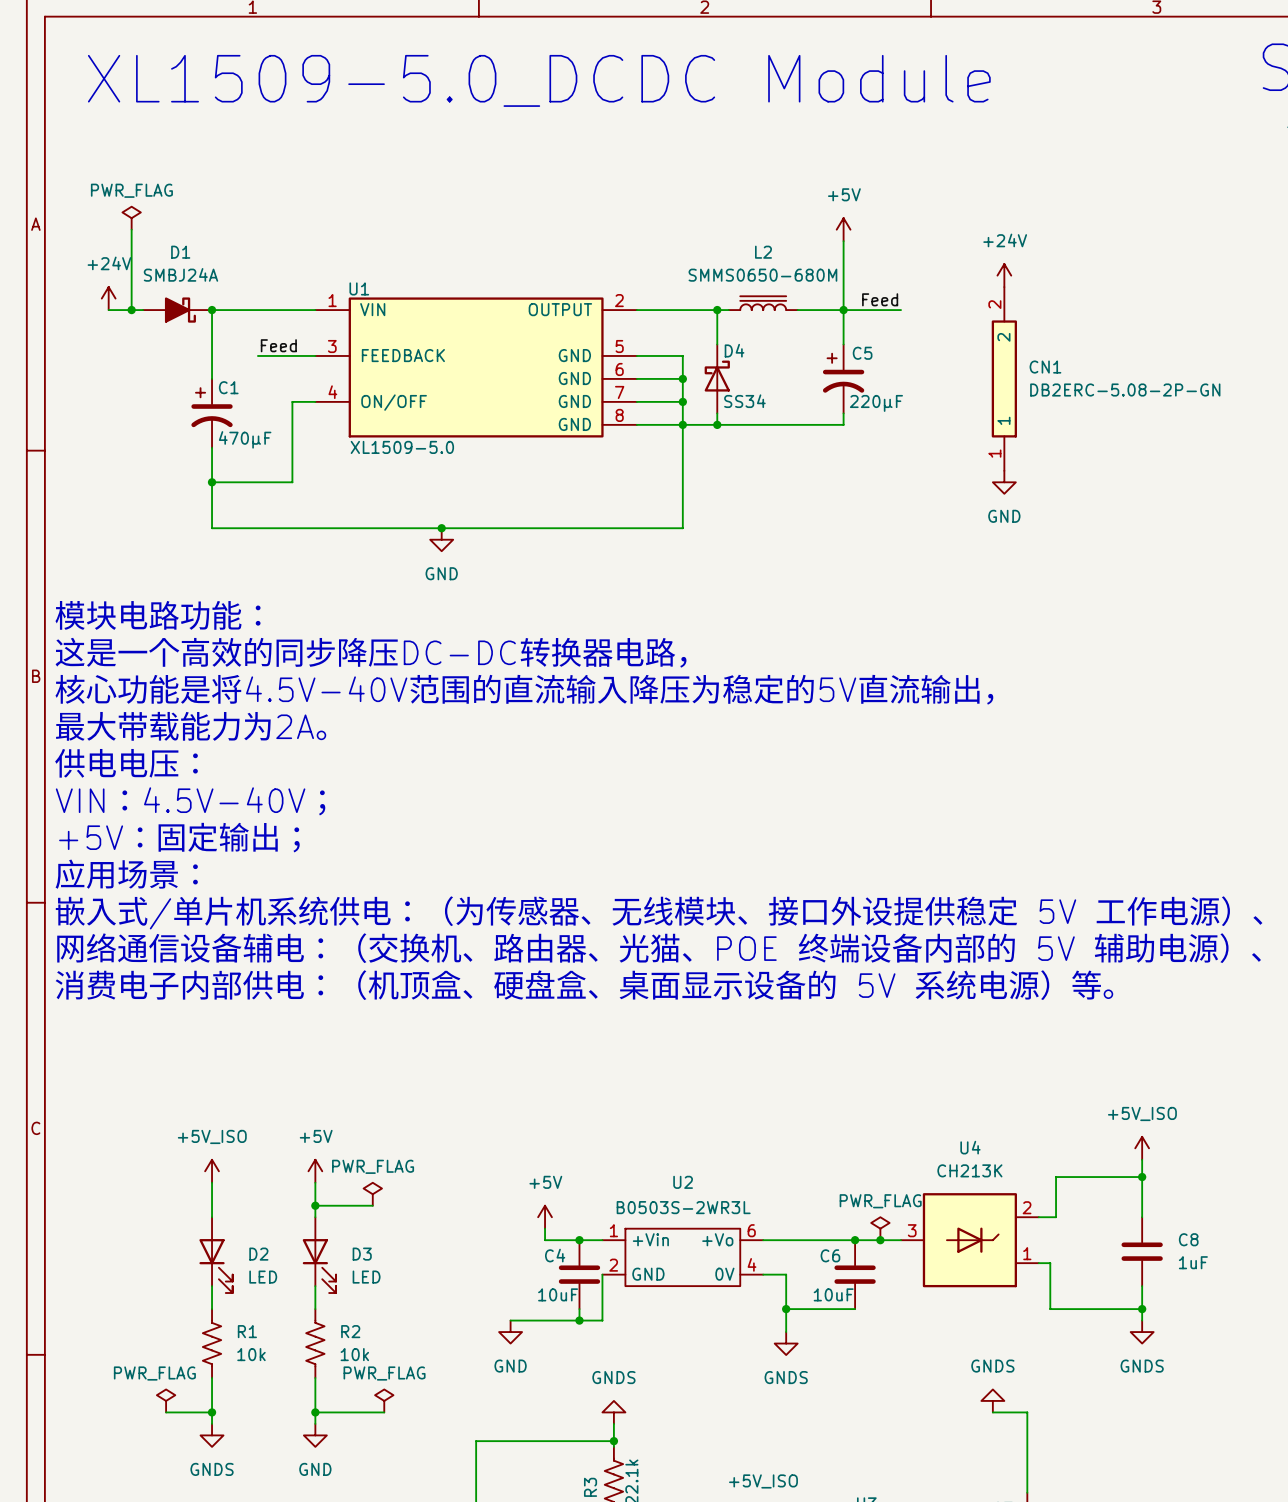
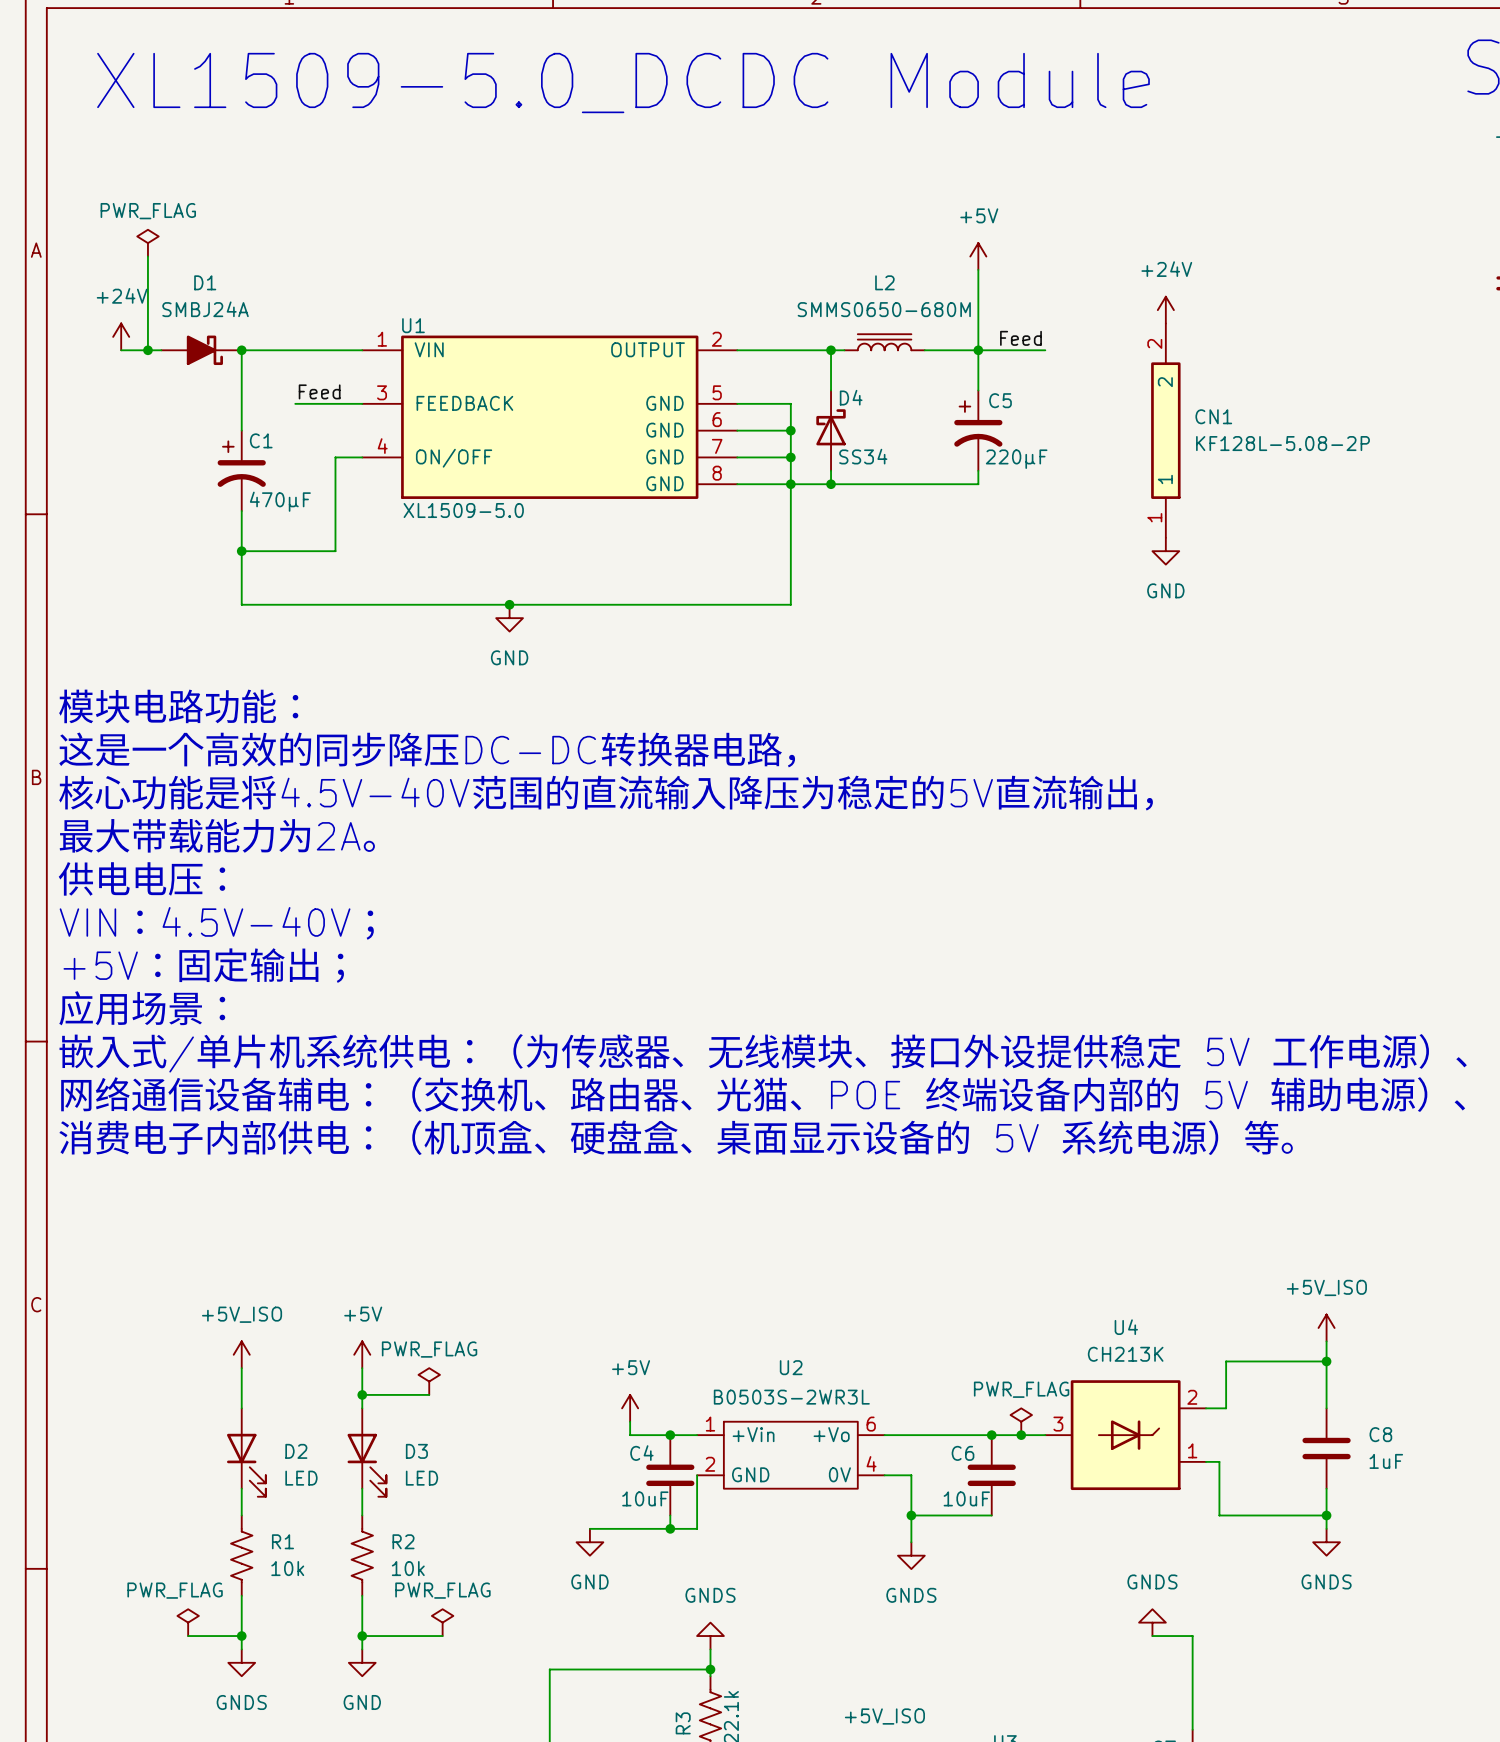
CN1 value: DB2ERC-5.08-2P-GN (1125, 390) -> KF128L-5.08-2P (1282, 443)

